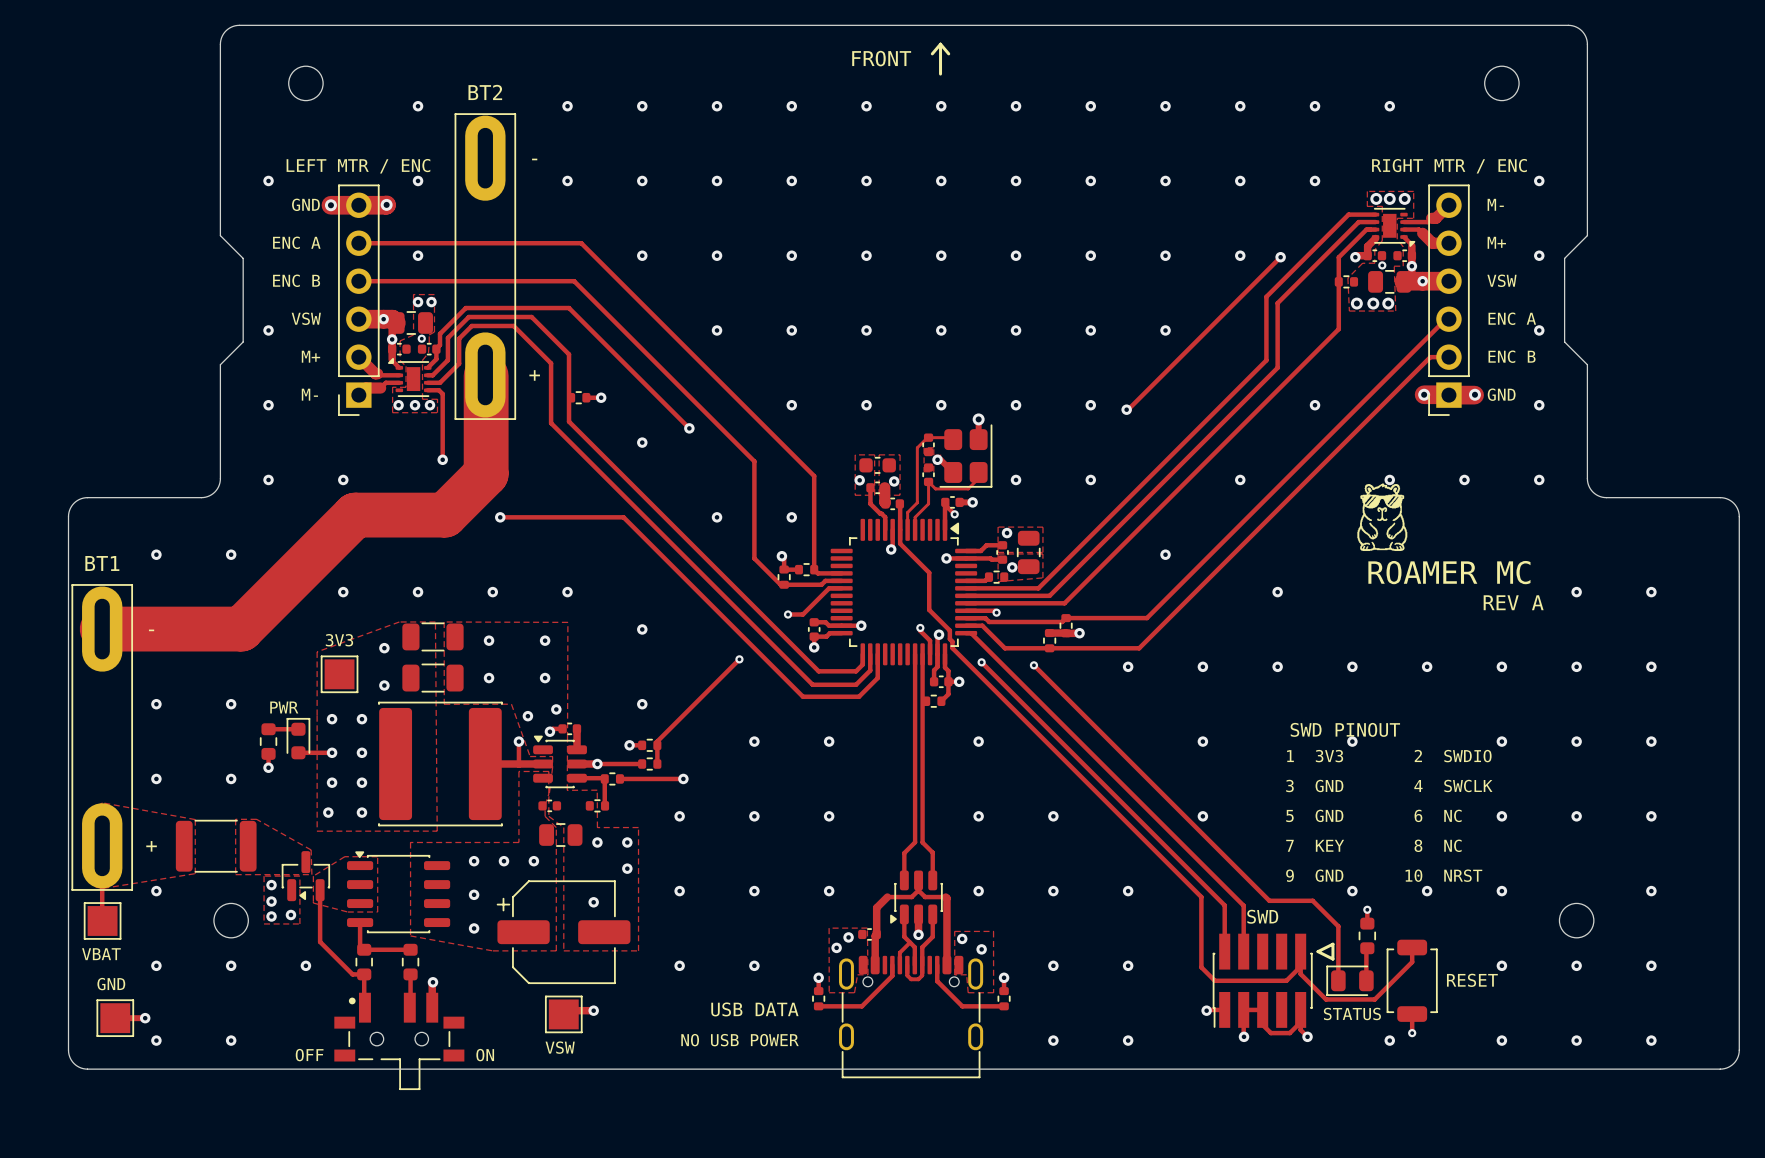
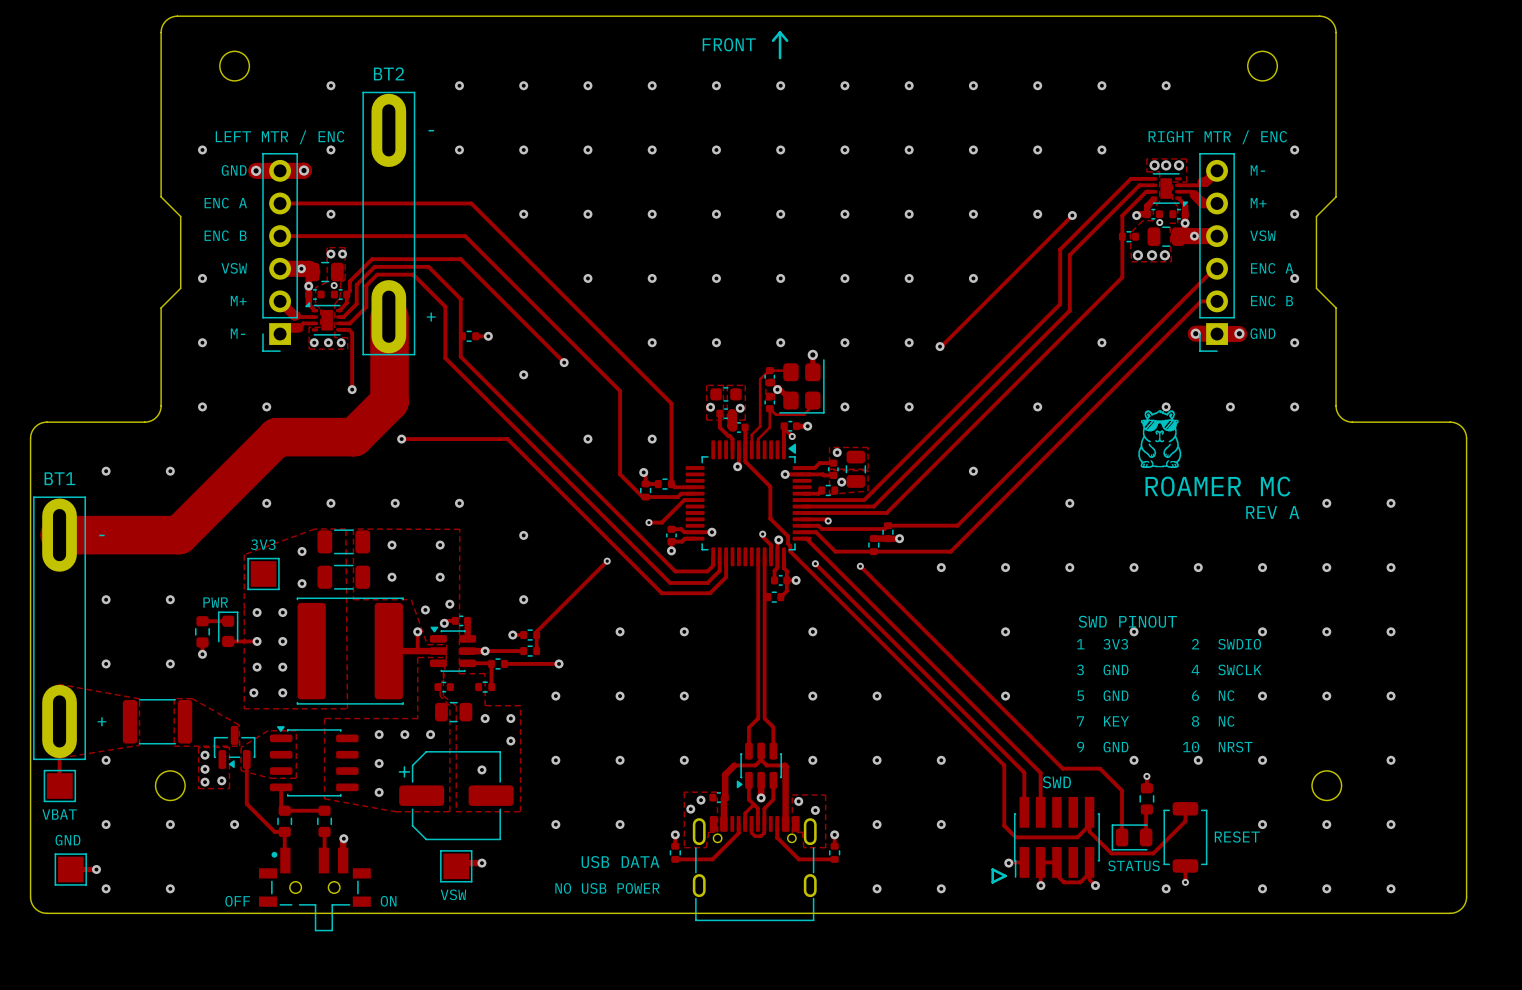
line: (1332, 944) (1318, 951) (1332, 959) (1332, 944) -> none
line: none -> (992, 869) (1005, 875) (992, 882) (992, 869)

